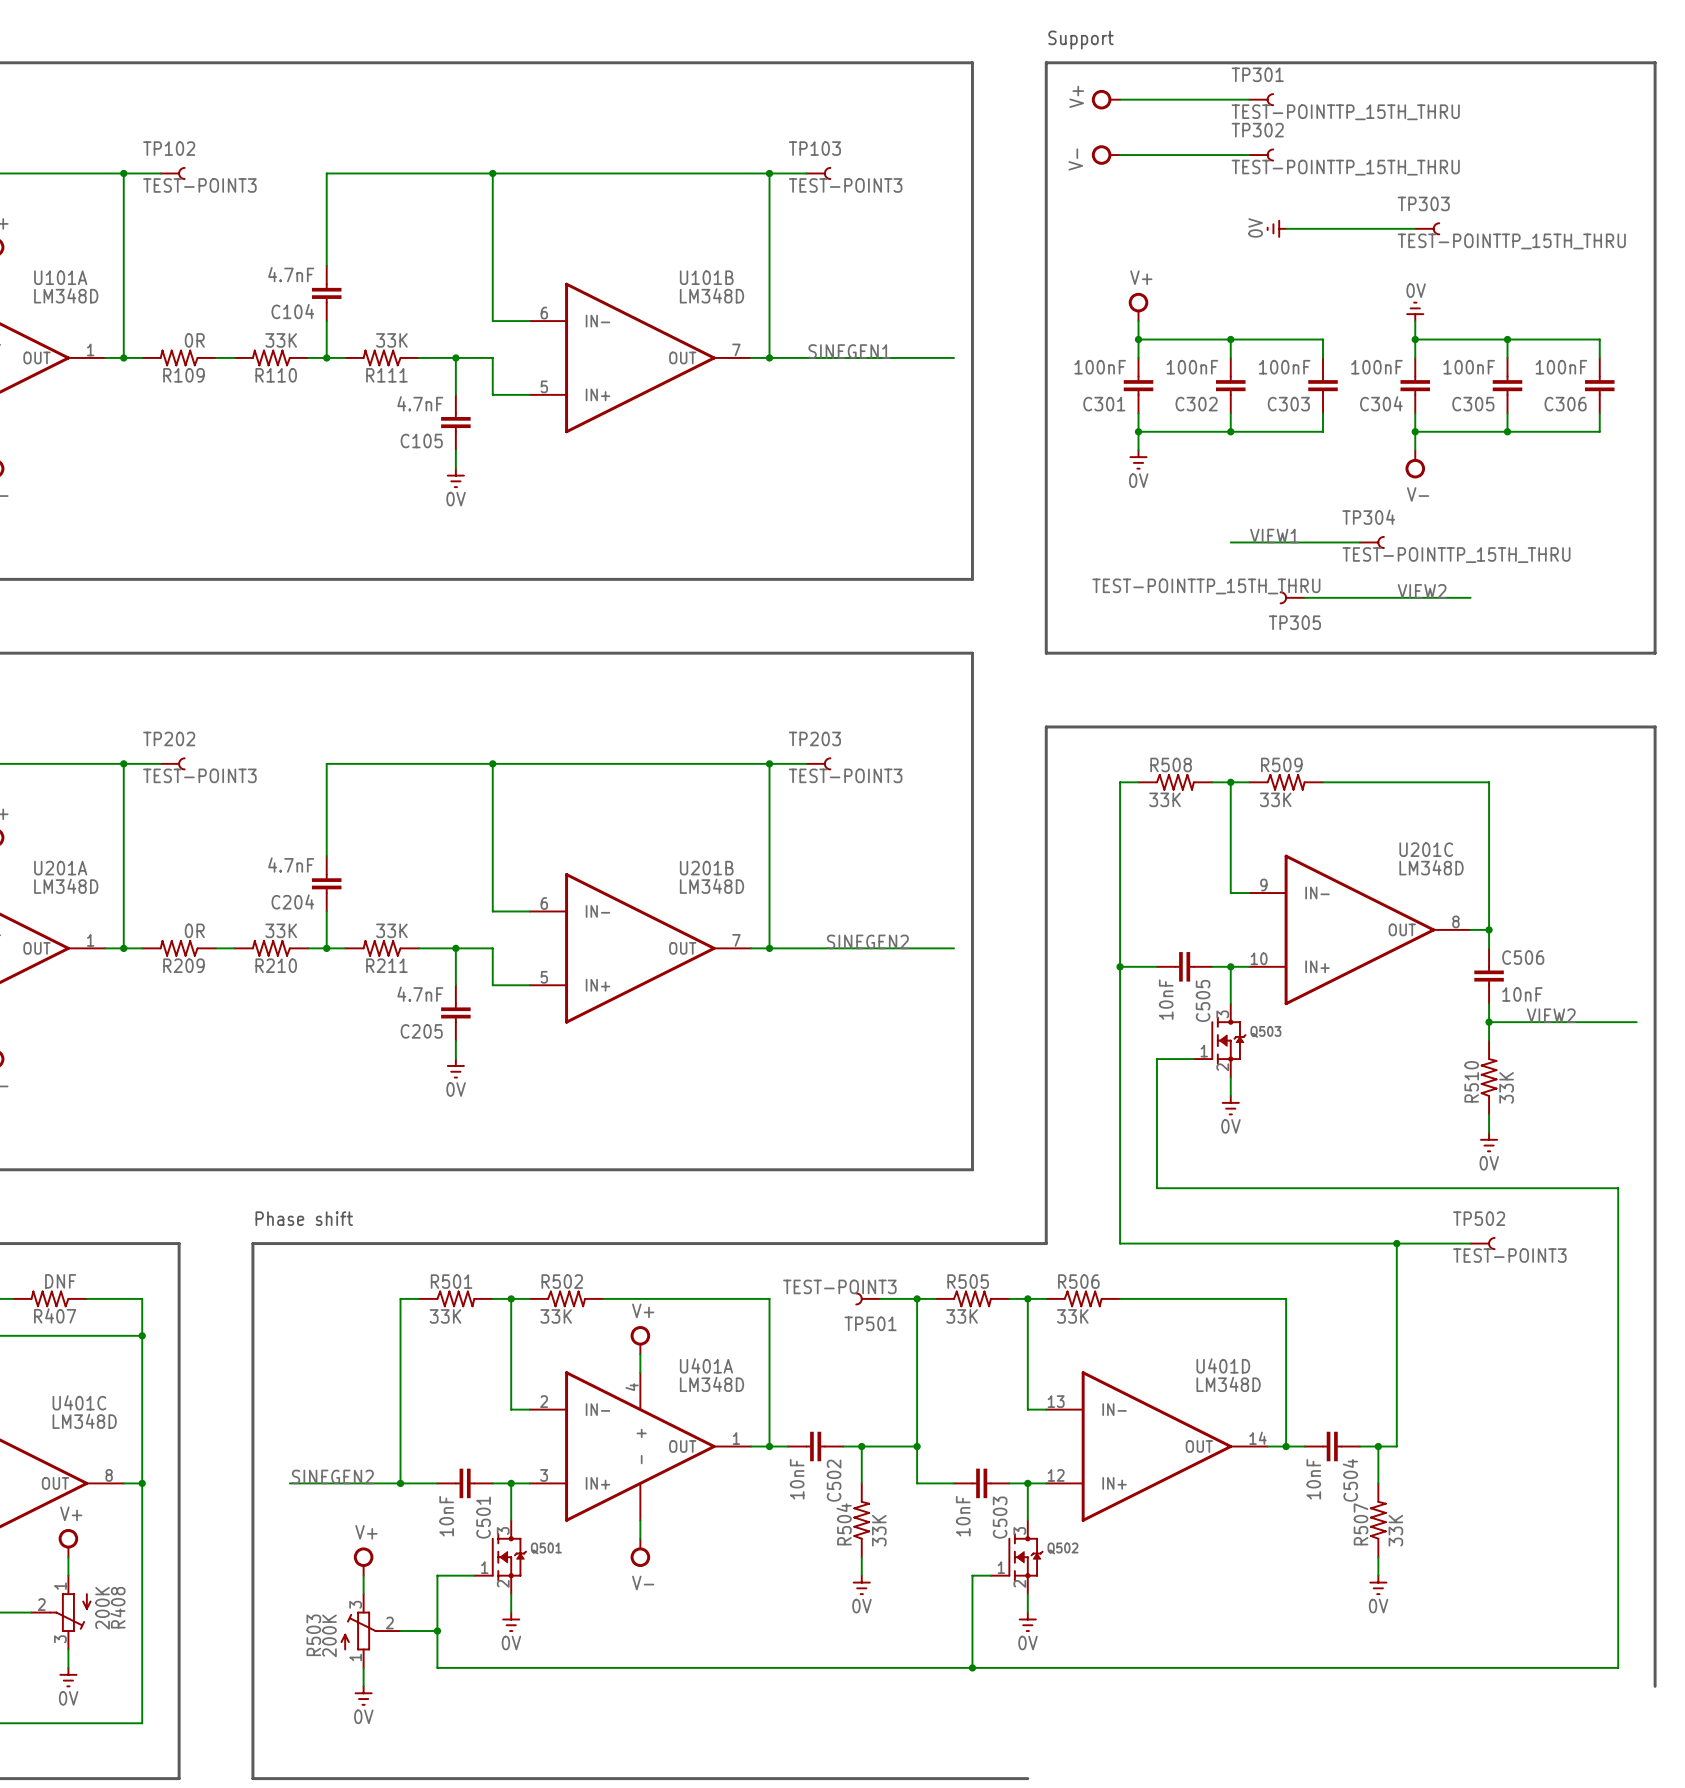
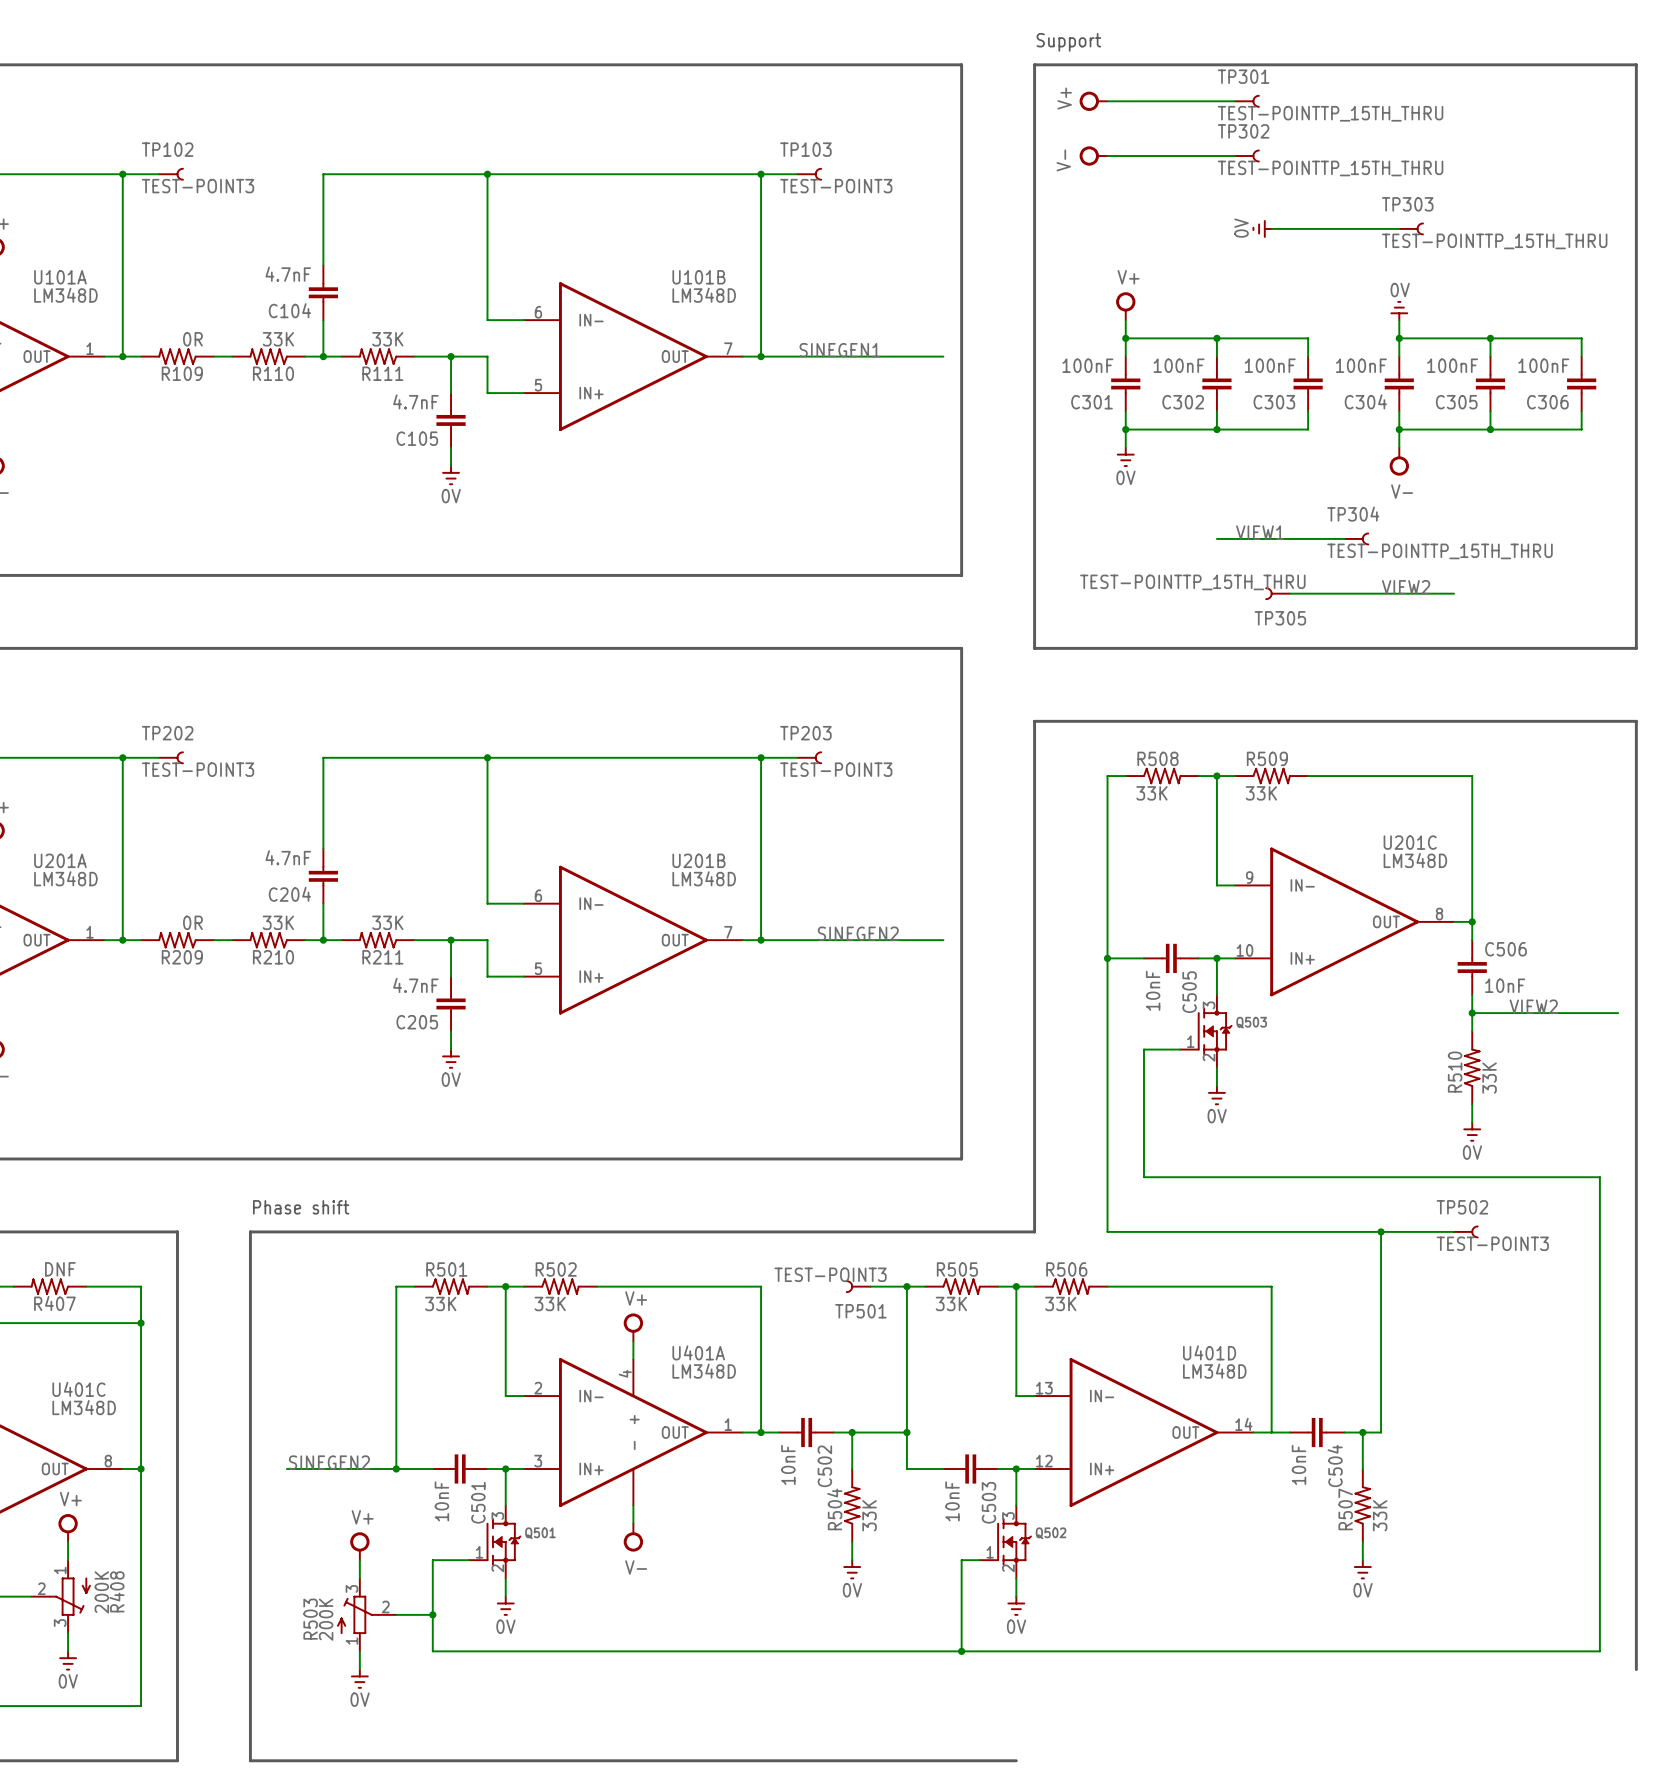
junction: (1286, 1446) -> none

